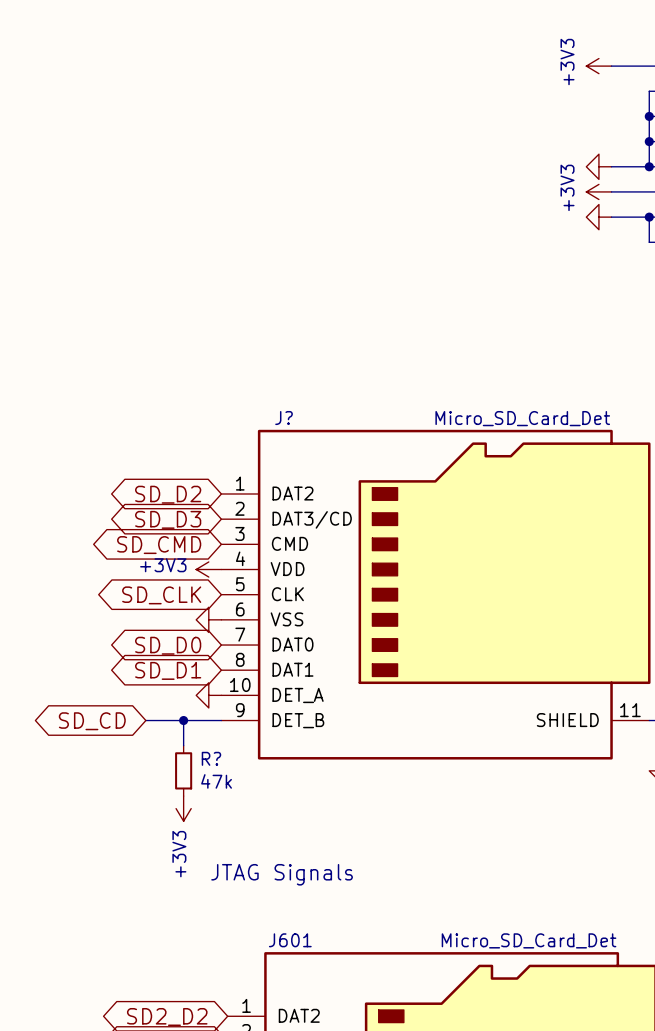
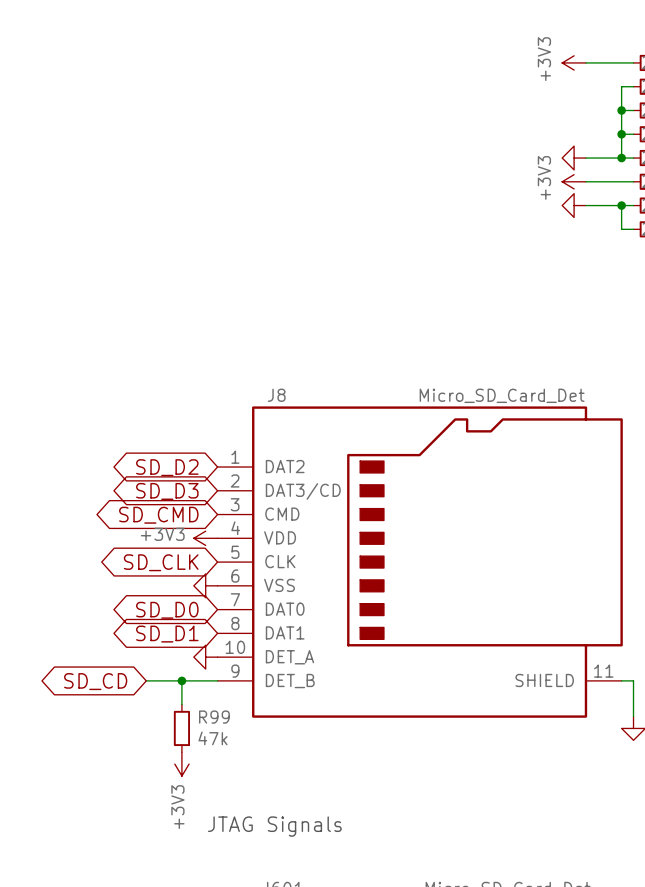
J? name: J? (284, 418) -> J8 (276, 395)
R? name: R? (211, 758) -> R99 (214, 717)

